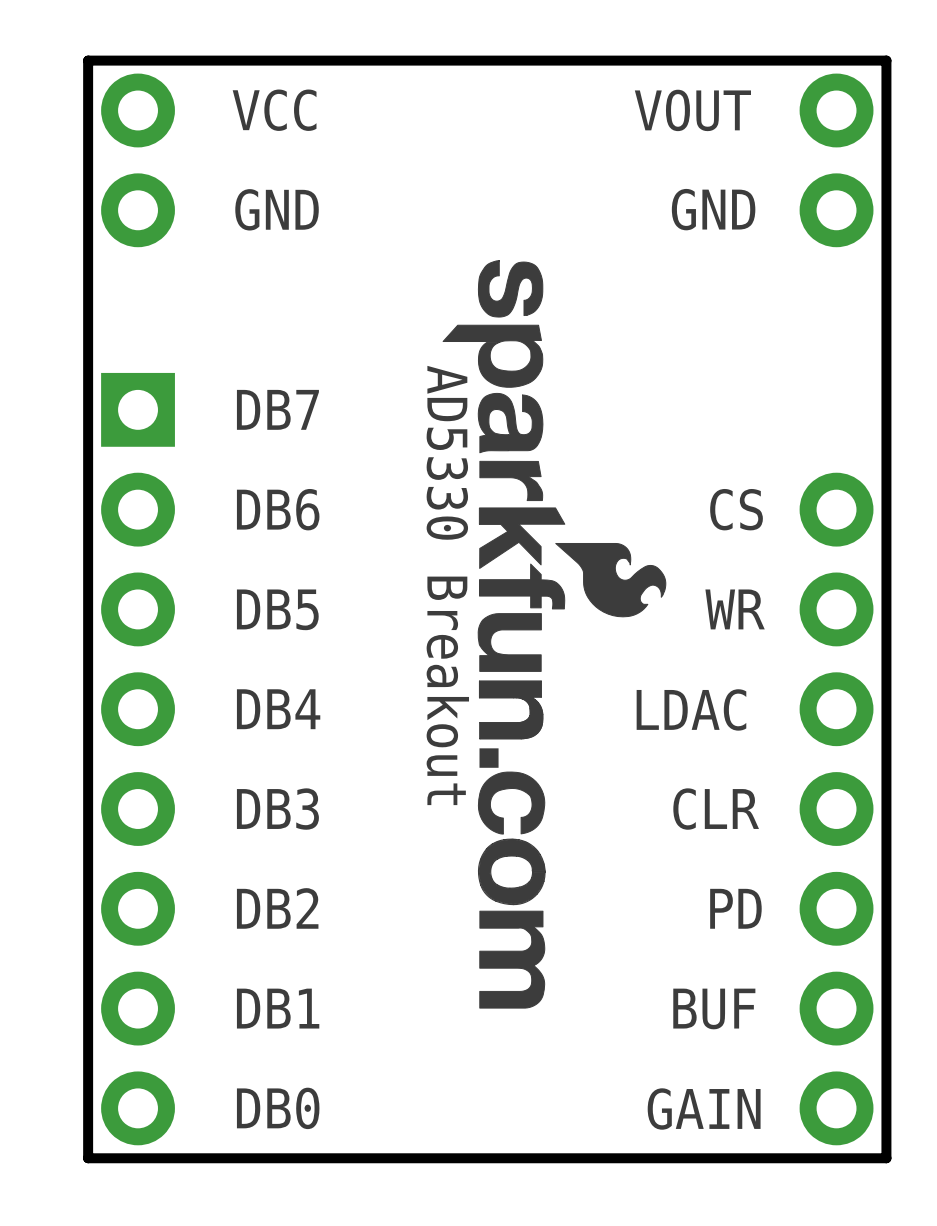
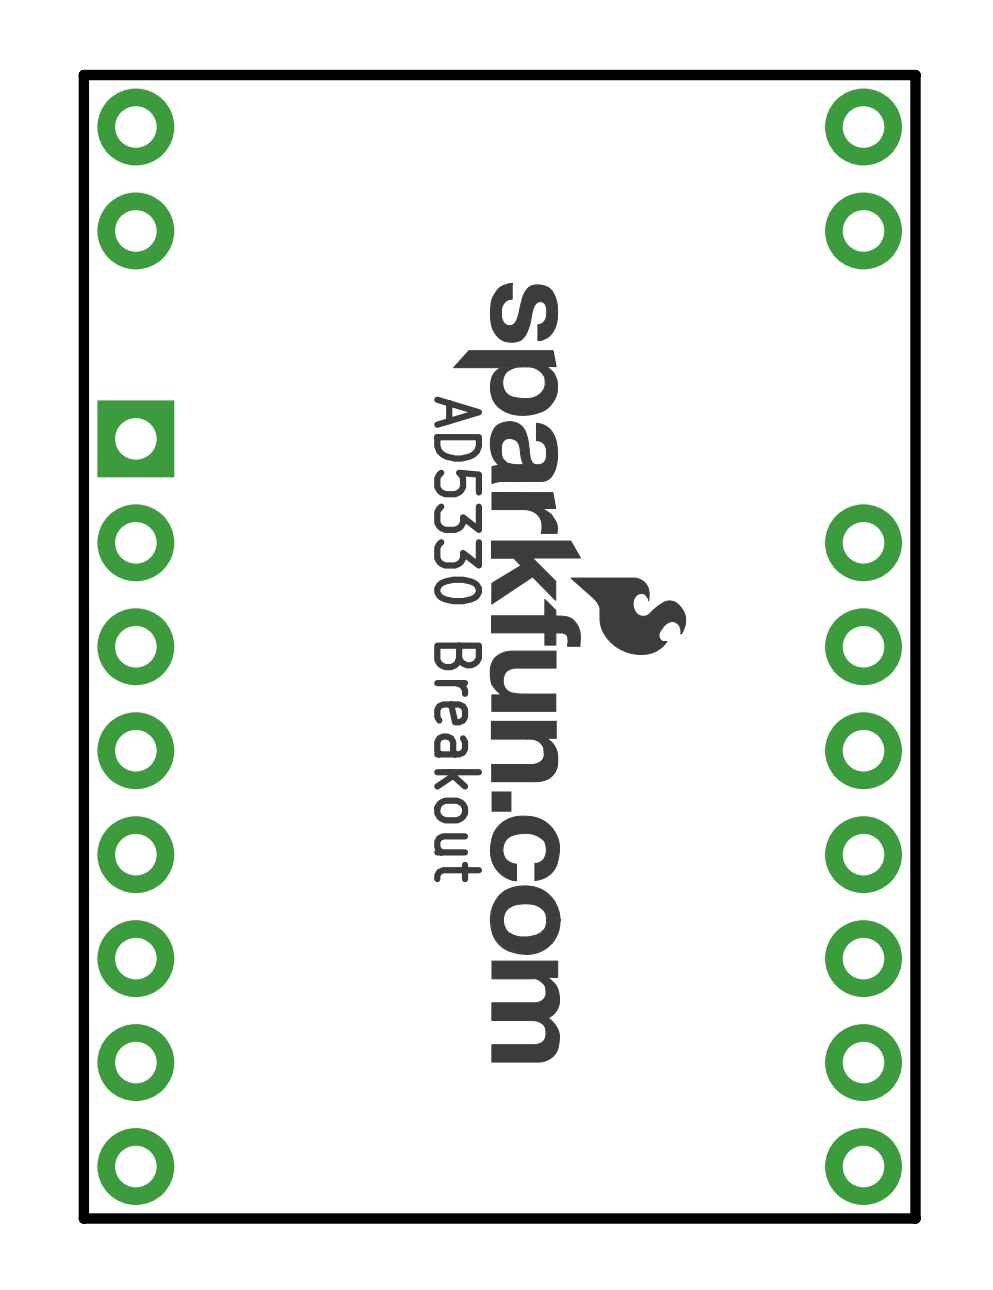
text: VCC (274, 110) -> none
text: VOUT (692, 110) -> none
text: GND (277, 209) -> none
text: GND (713, 209) -> none
text: DB7 (277, 409) -> none
text: DB6 (278, 509) -> none
text: CS (736, 509) -> none
text: DB5 (277, 609) -> none
text: WR (735, 609) -> none
text: DB4 (278, 709) -> none
text: LDAC (691, 709) -> none
text: DB3 (277, 809) -> none
text: CLR (716, 809) -> none
text: DB2 (277, 908) -> none
text: PD (735, 908) -> none
text: DB1 (278, 1008) -> none
text: BUF (714, 1008) -> none
text: DB0 (278, 1108) -> none
text: GAIN (704, 1109) -> none

